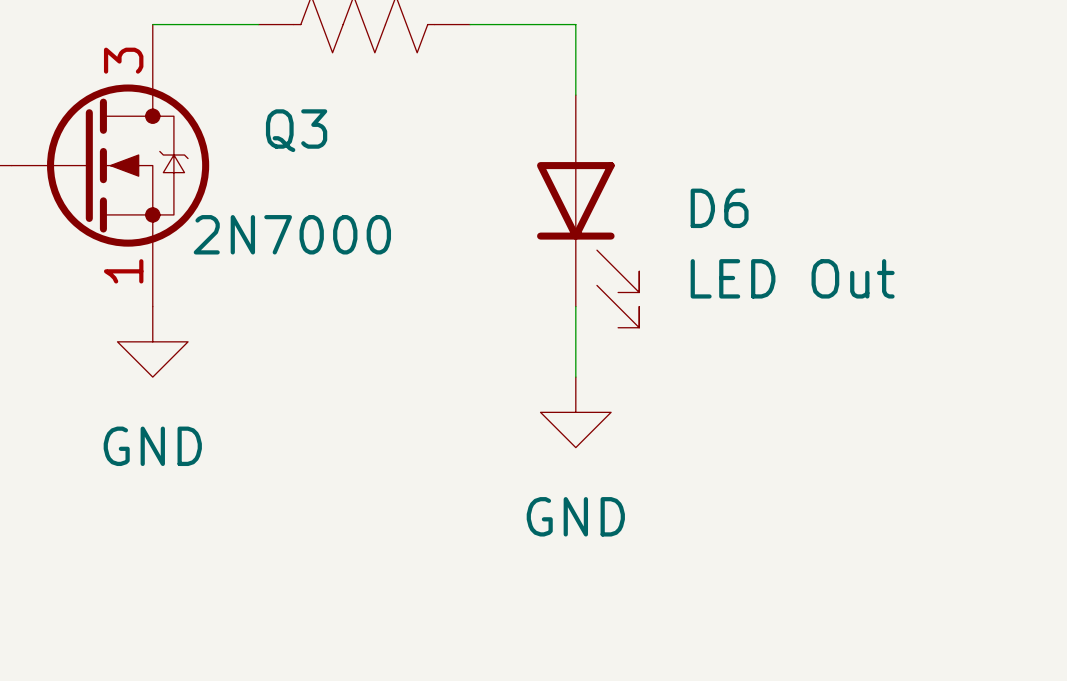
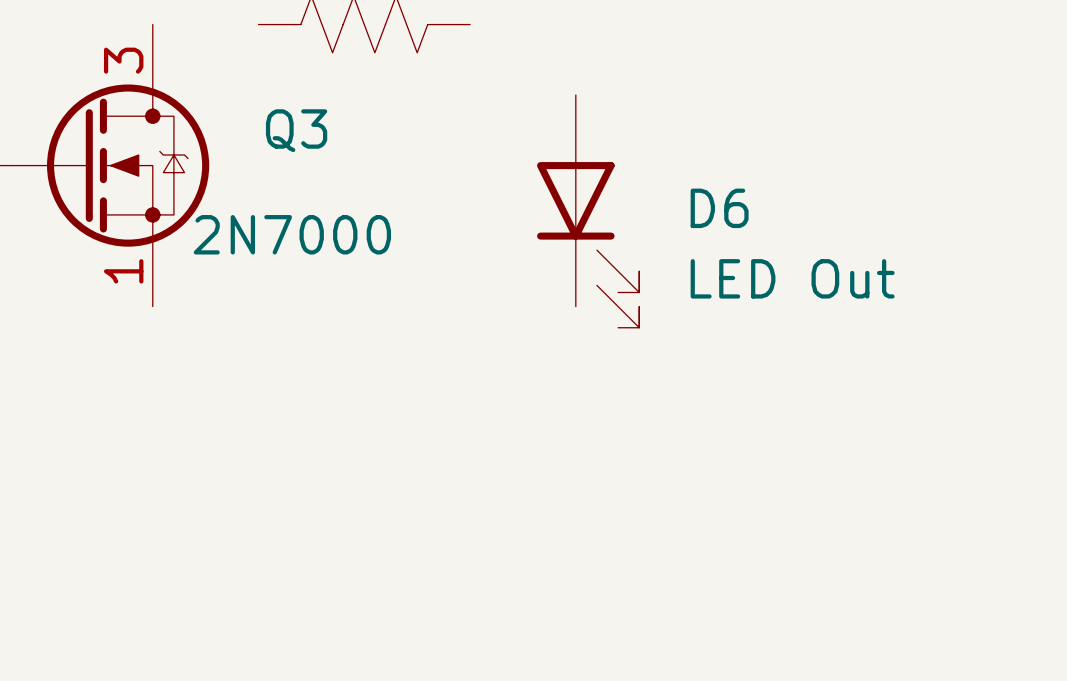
wire: (152, 24) (258, 24) -> none
wire: (470, 24) (575, 24) (575, 95) -> none
wire: (575, 306) (575, 377) -> none
power symbol: GND (152, 341) -> none
power symbol: GND (575, 412) -> none

